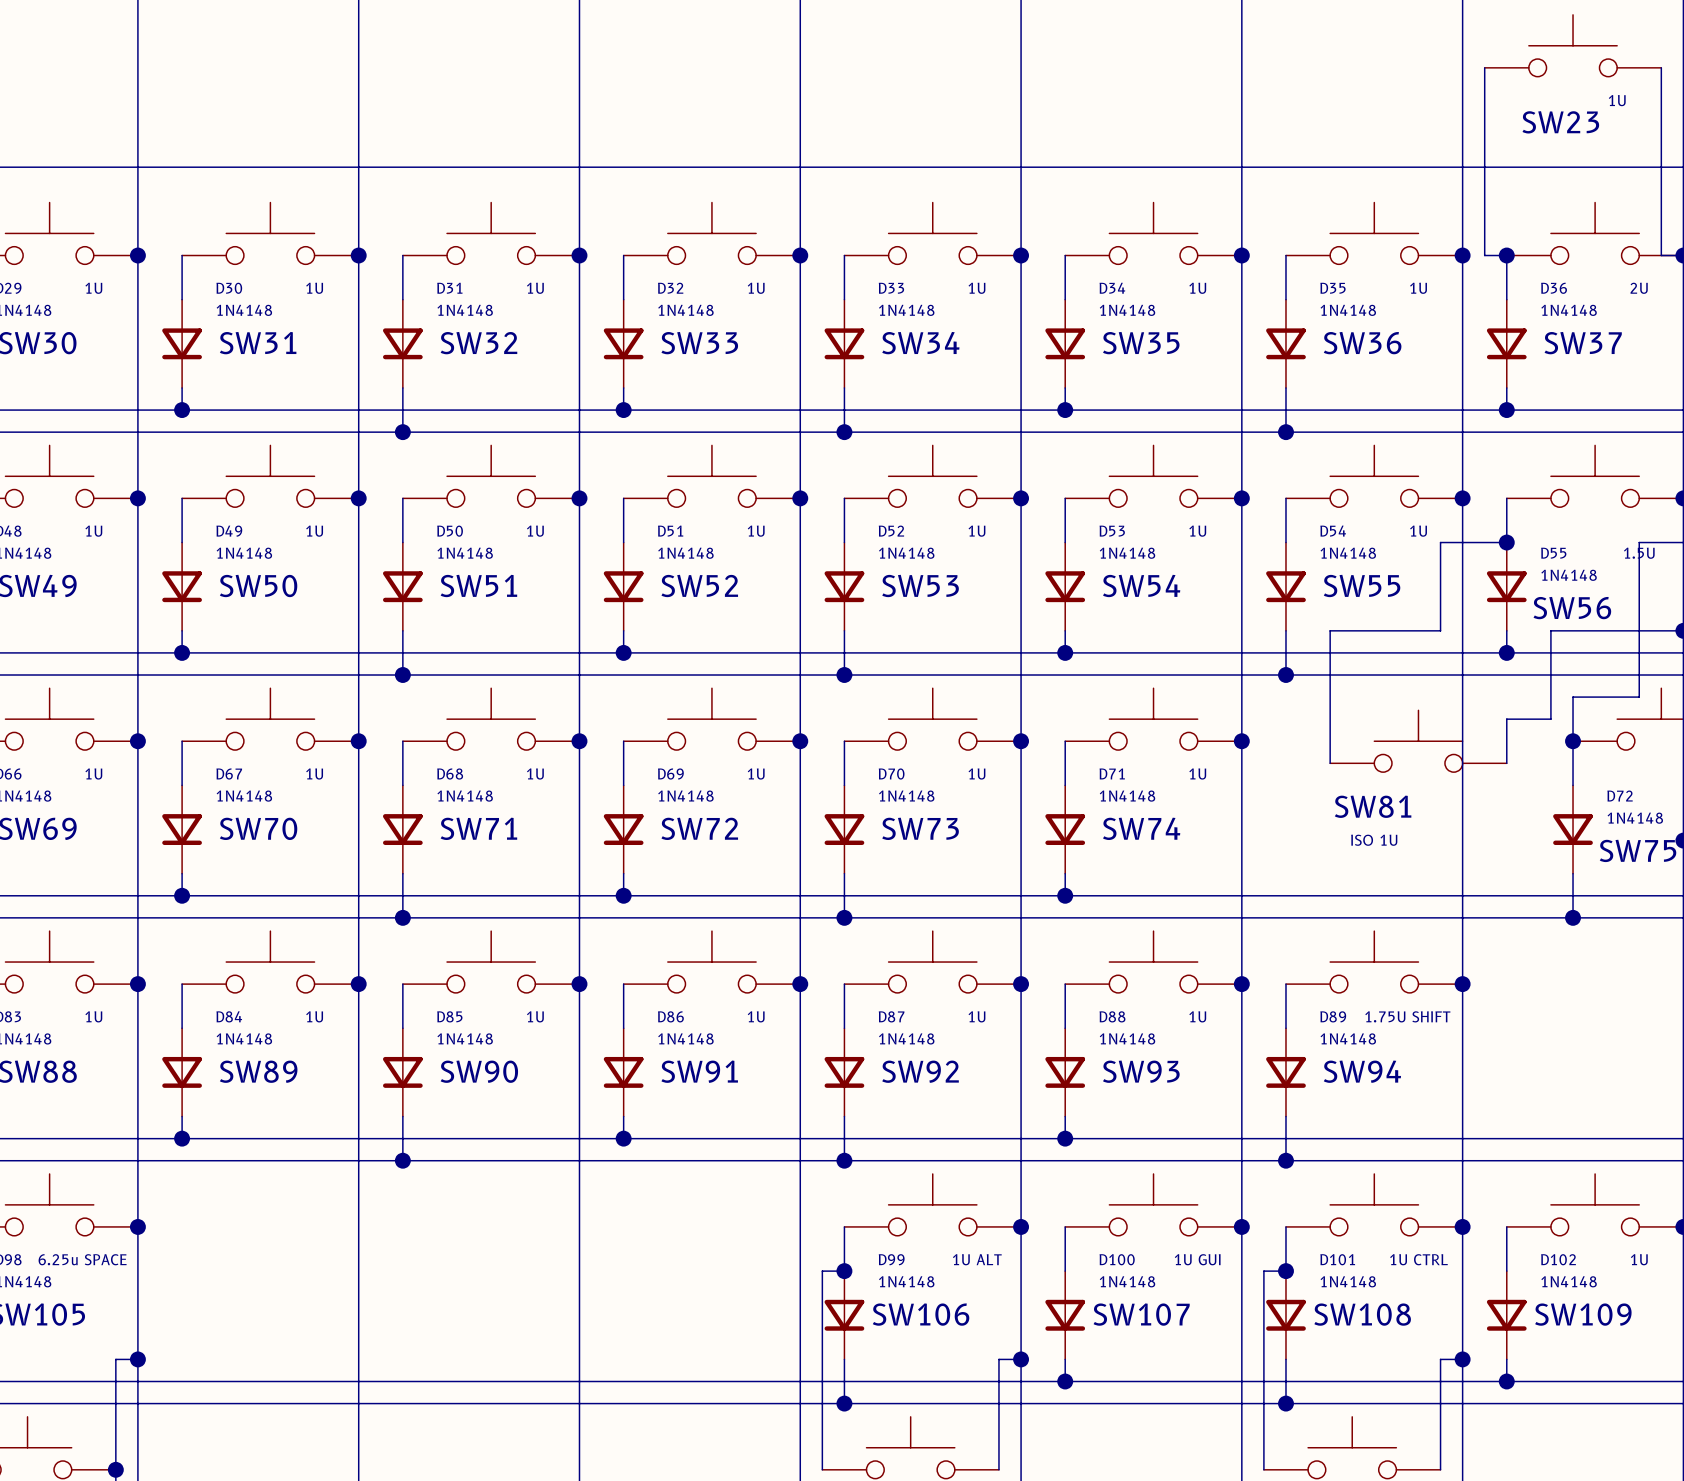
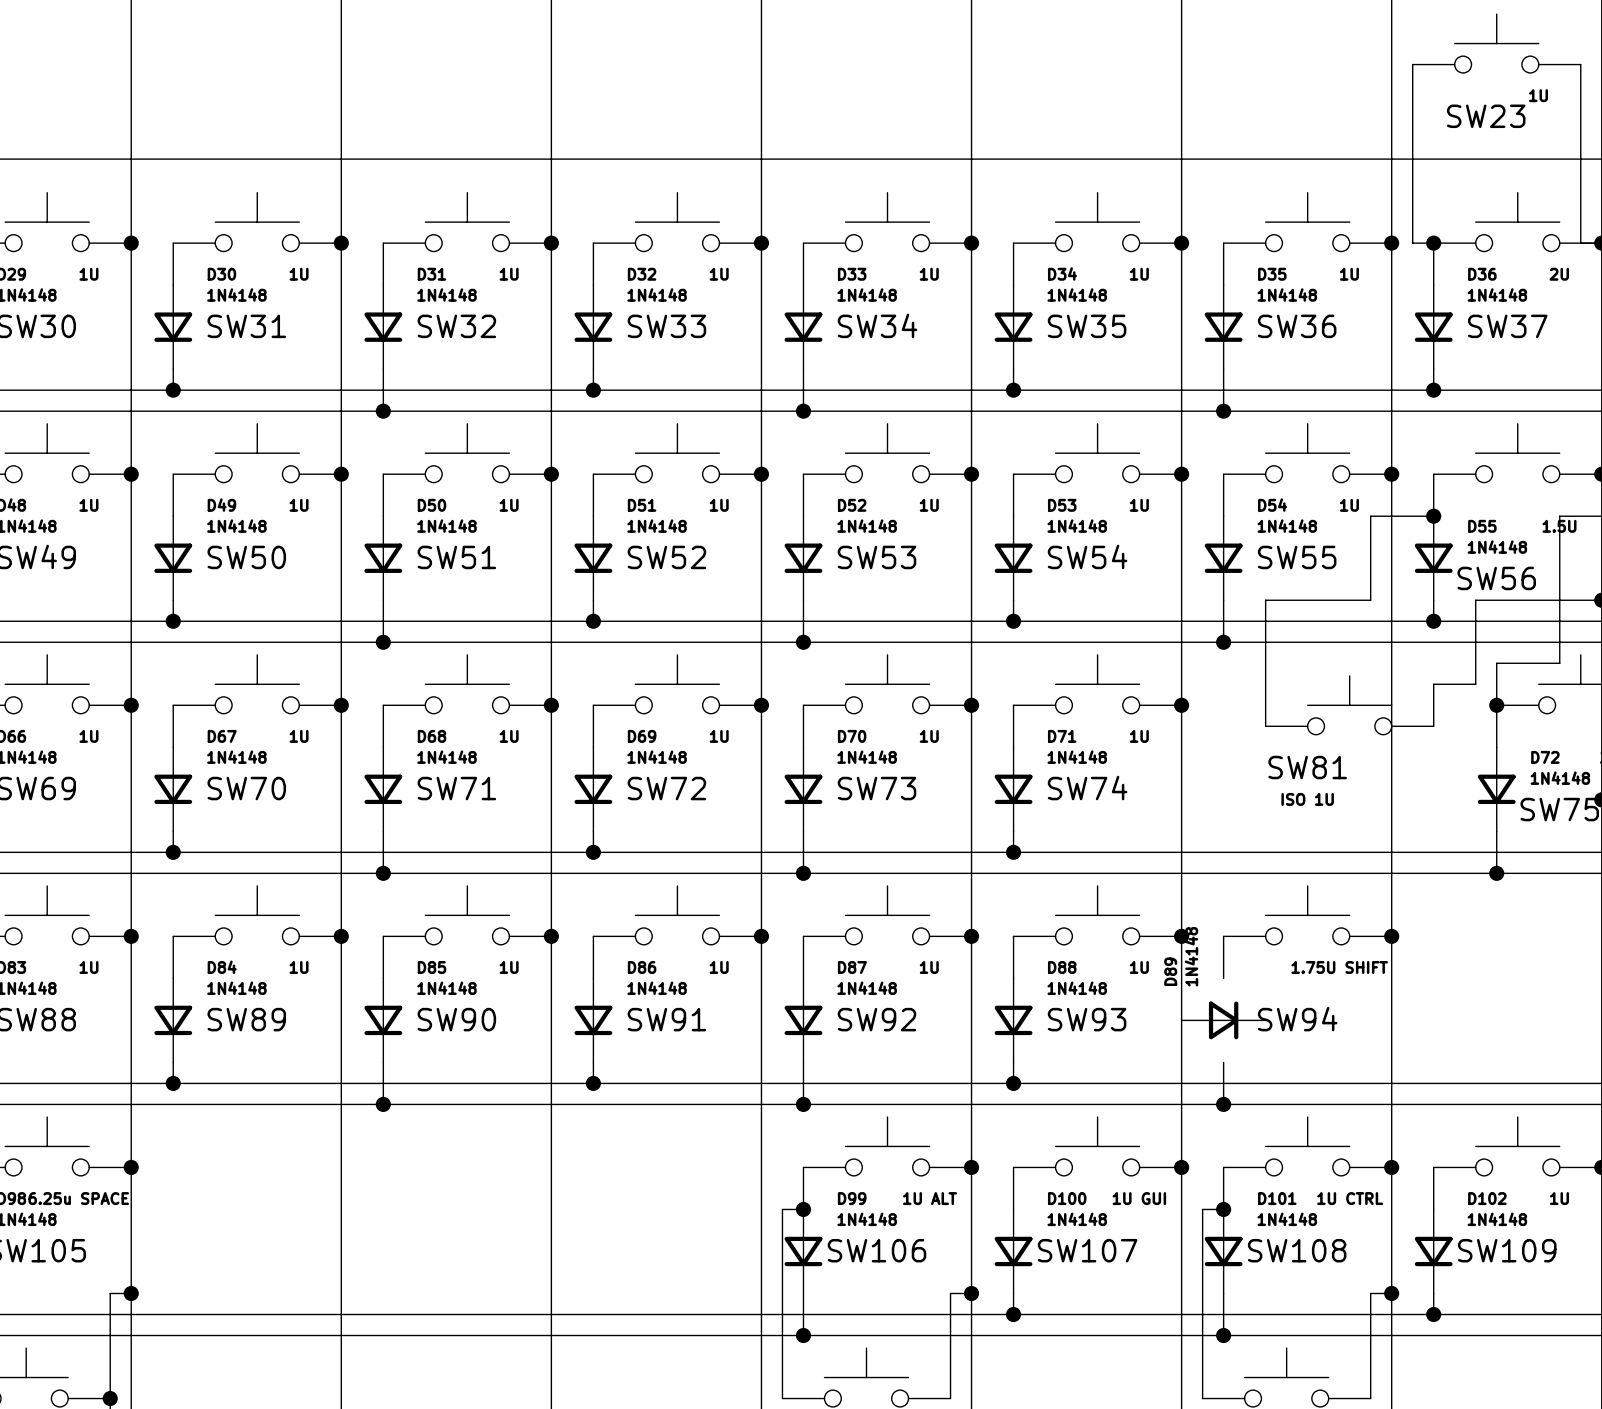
D89 rotation: 0° (1285, 1072) -> 90° counterclockwise (1223, 1020)

